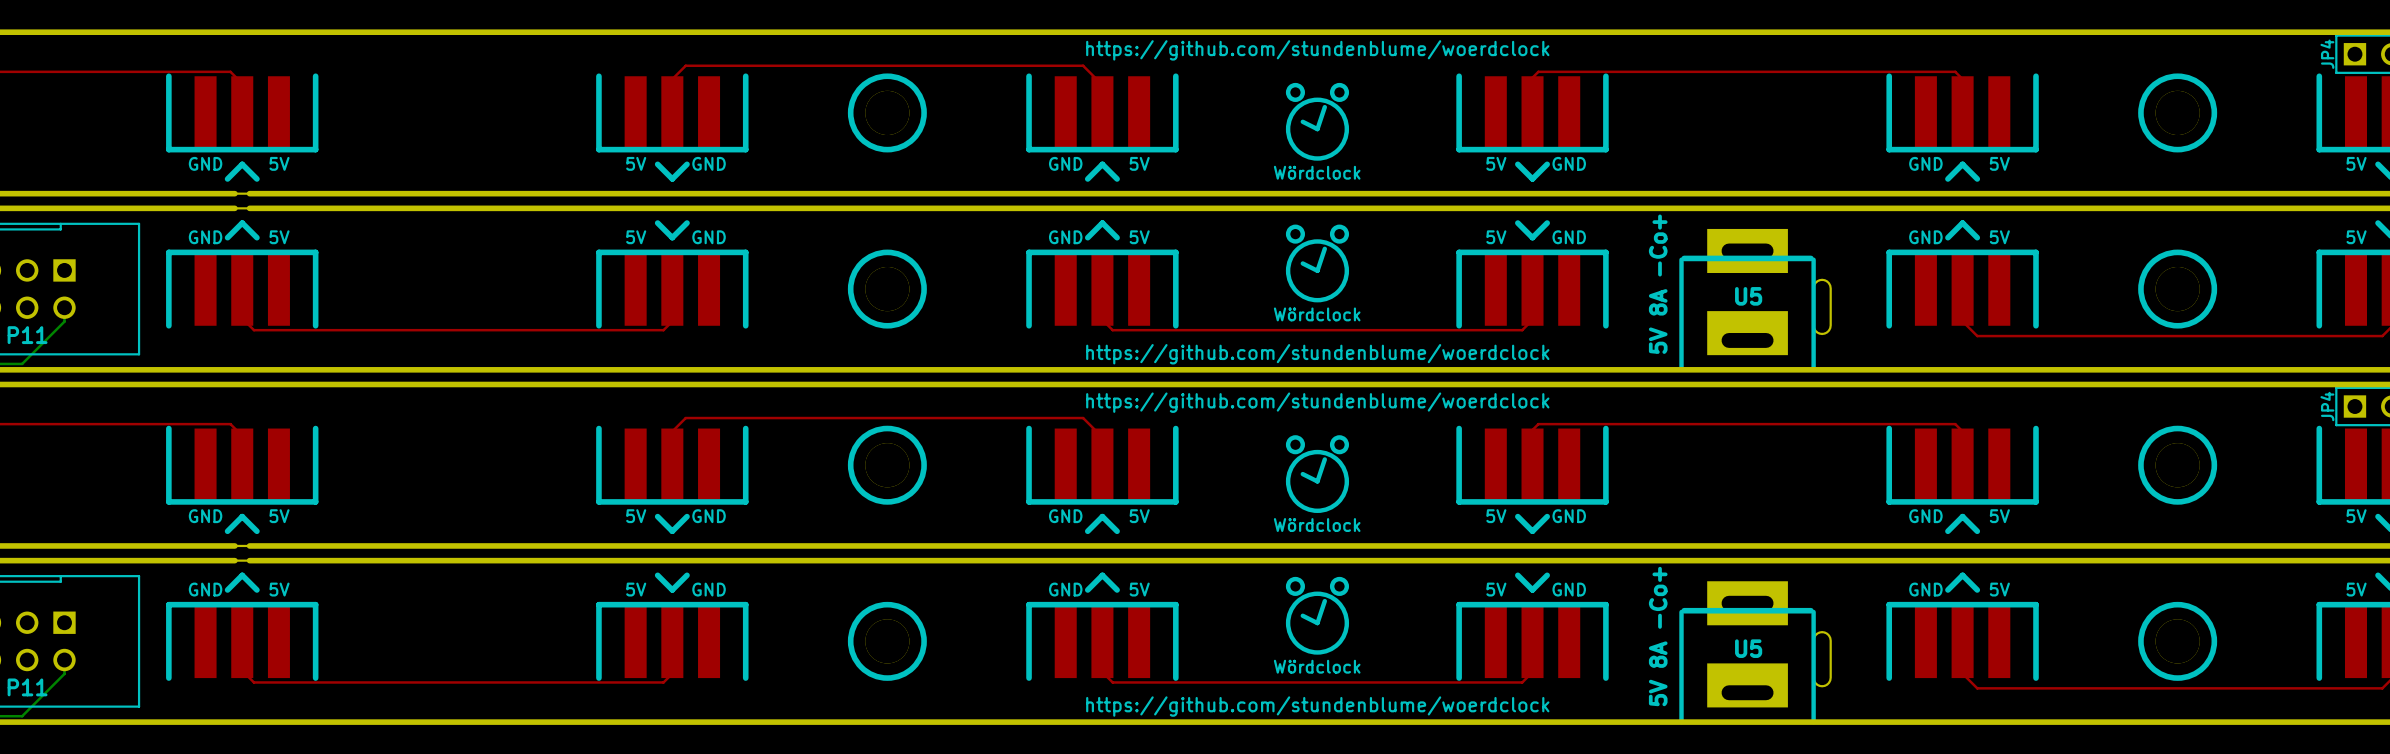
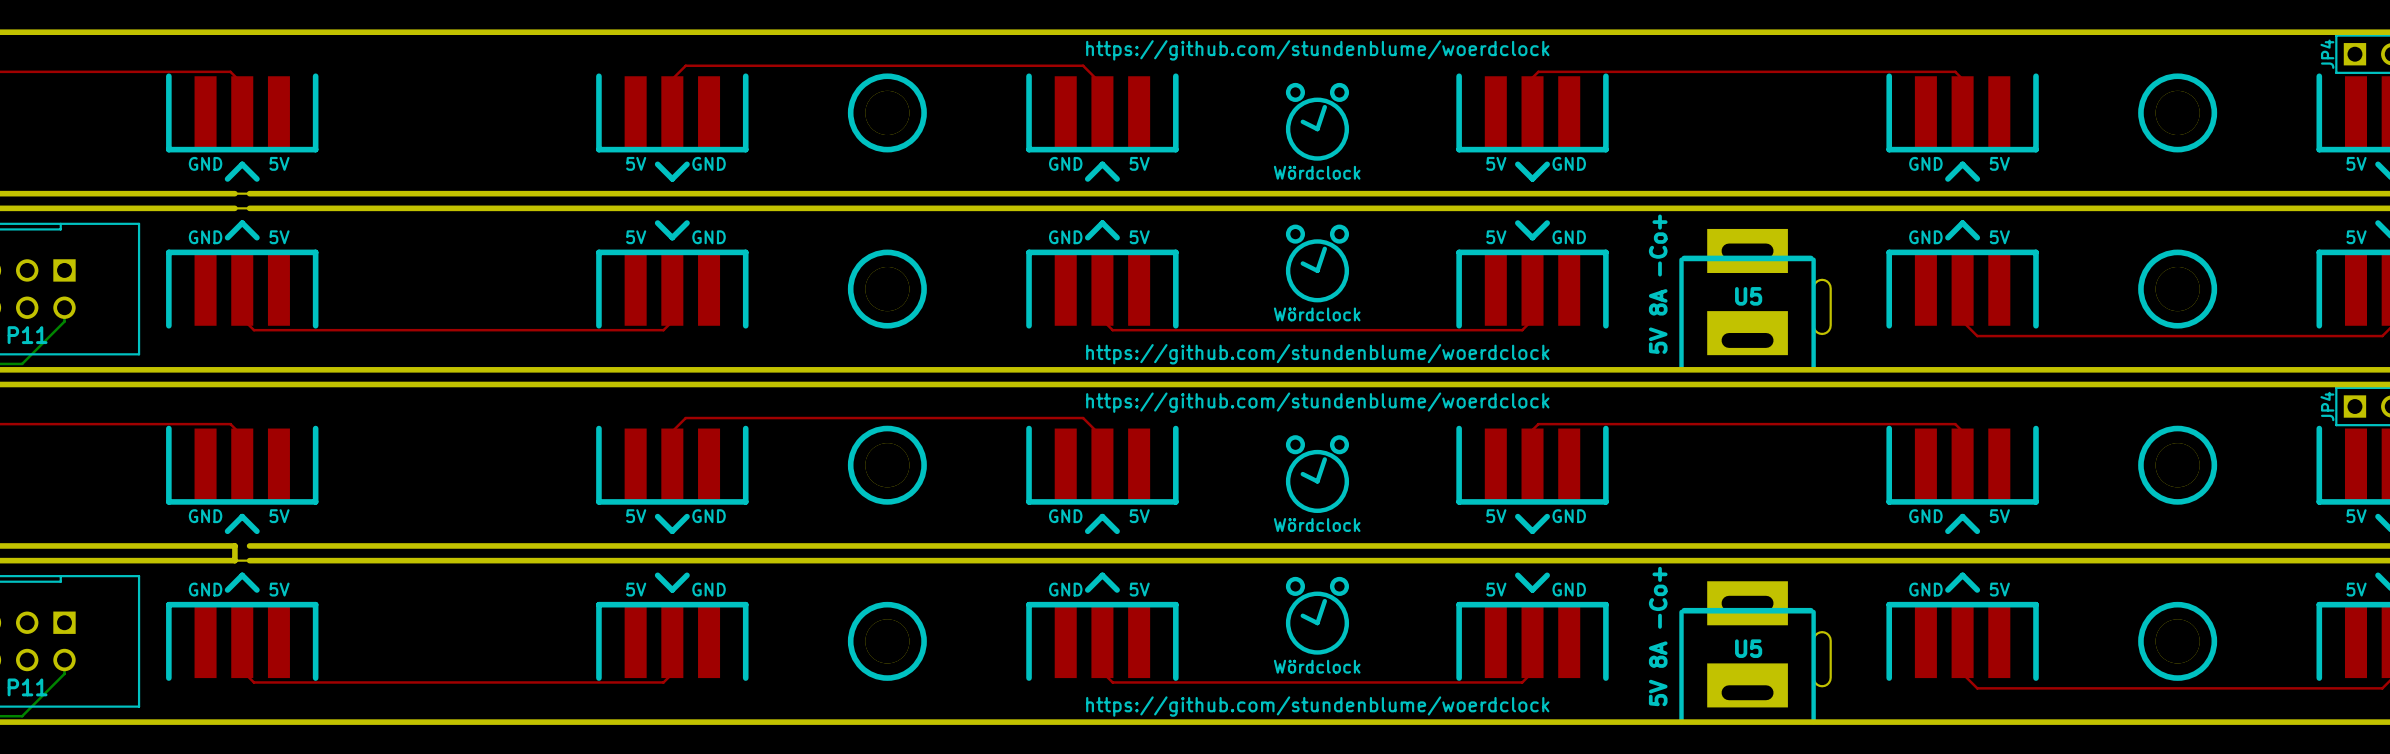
board edge: (234, 545) (249, 545) -> (234, 545) (234, 560)

